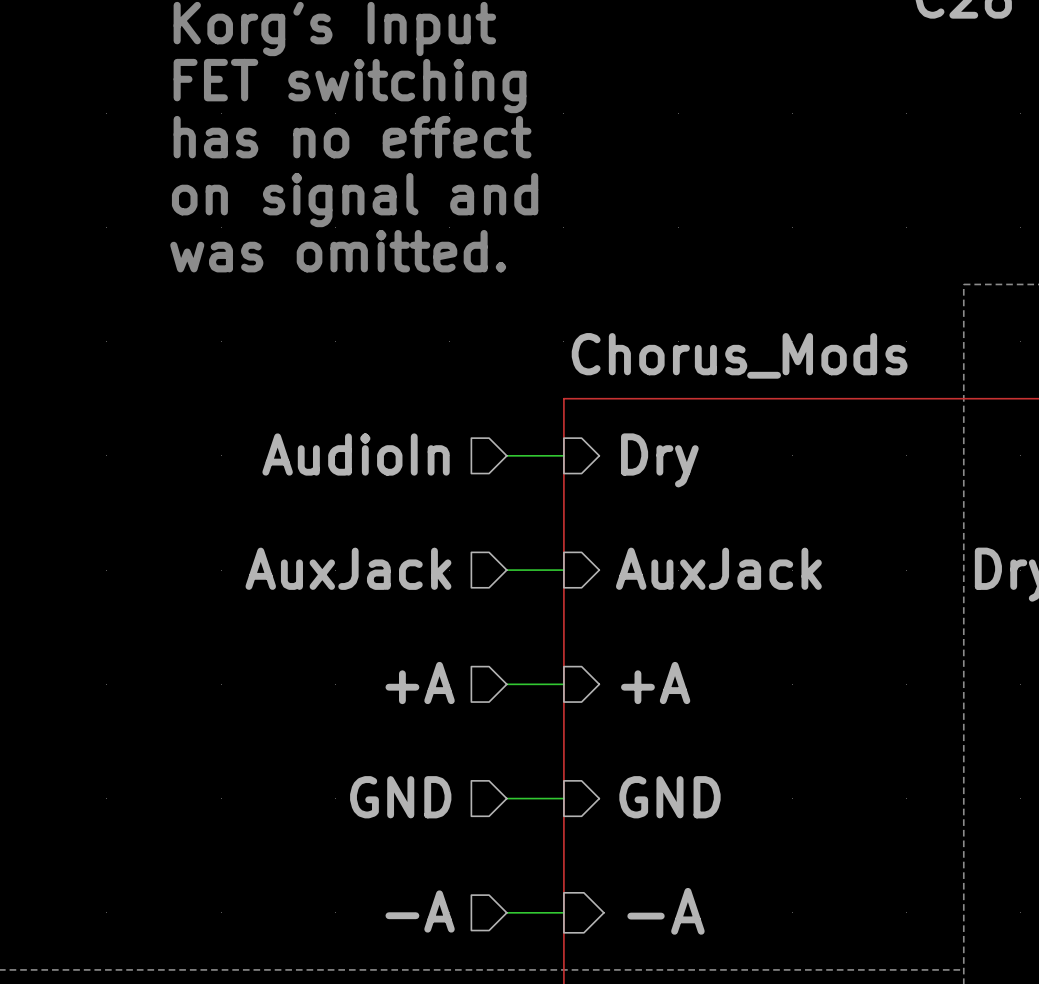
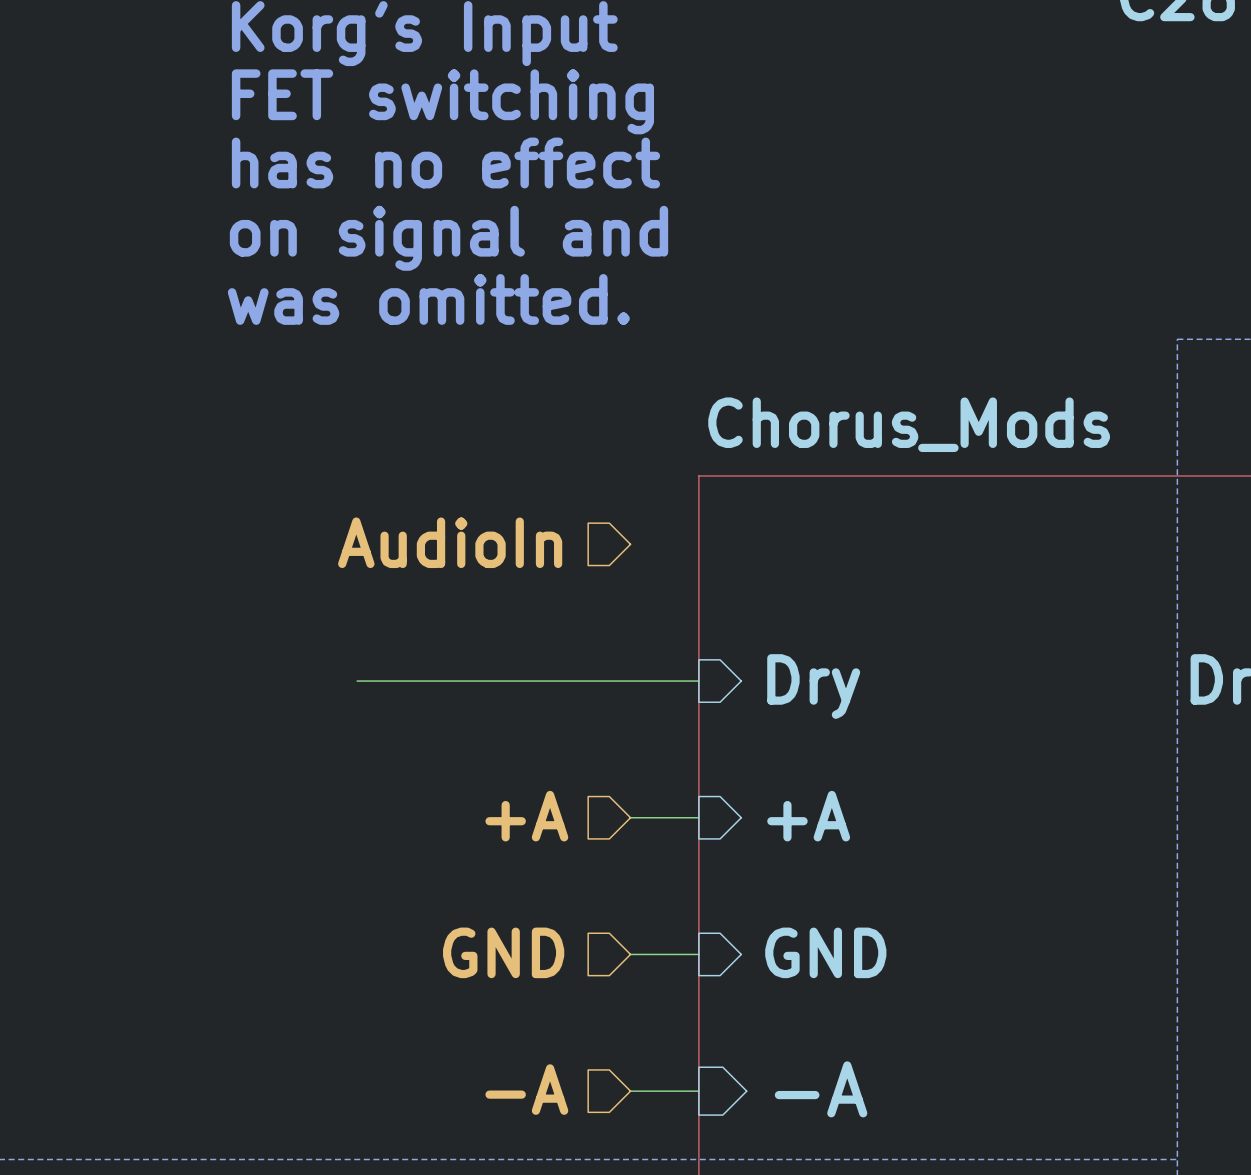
wire: (506, 455) (563, 455) -> none
sheet pin: Dry (659, 460) -> none
hierarchical label: AuxJack (348, 568) -> none
sheet pin: AuxJack (718, 568) -> Dry (813, 686)
wire: none -> (357, 681) (630, 681)

